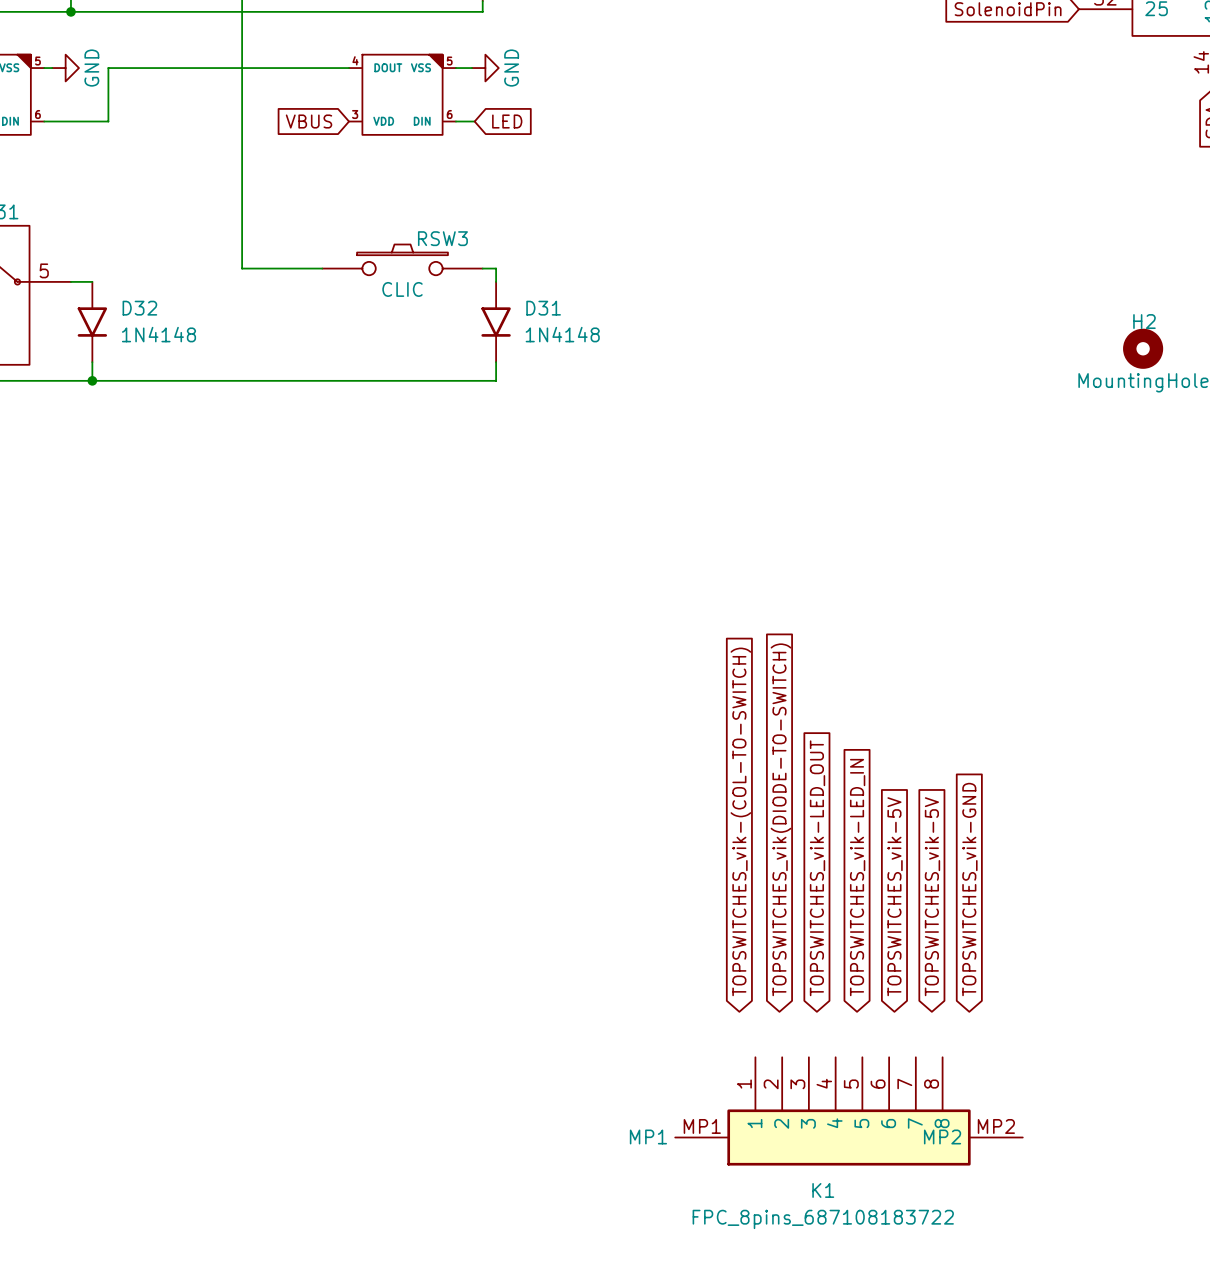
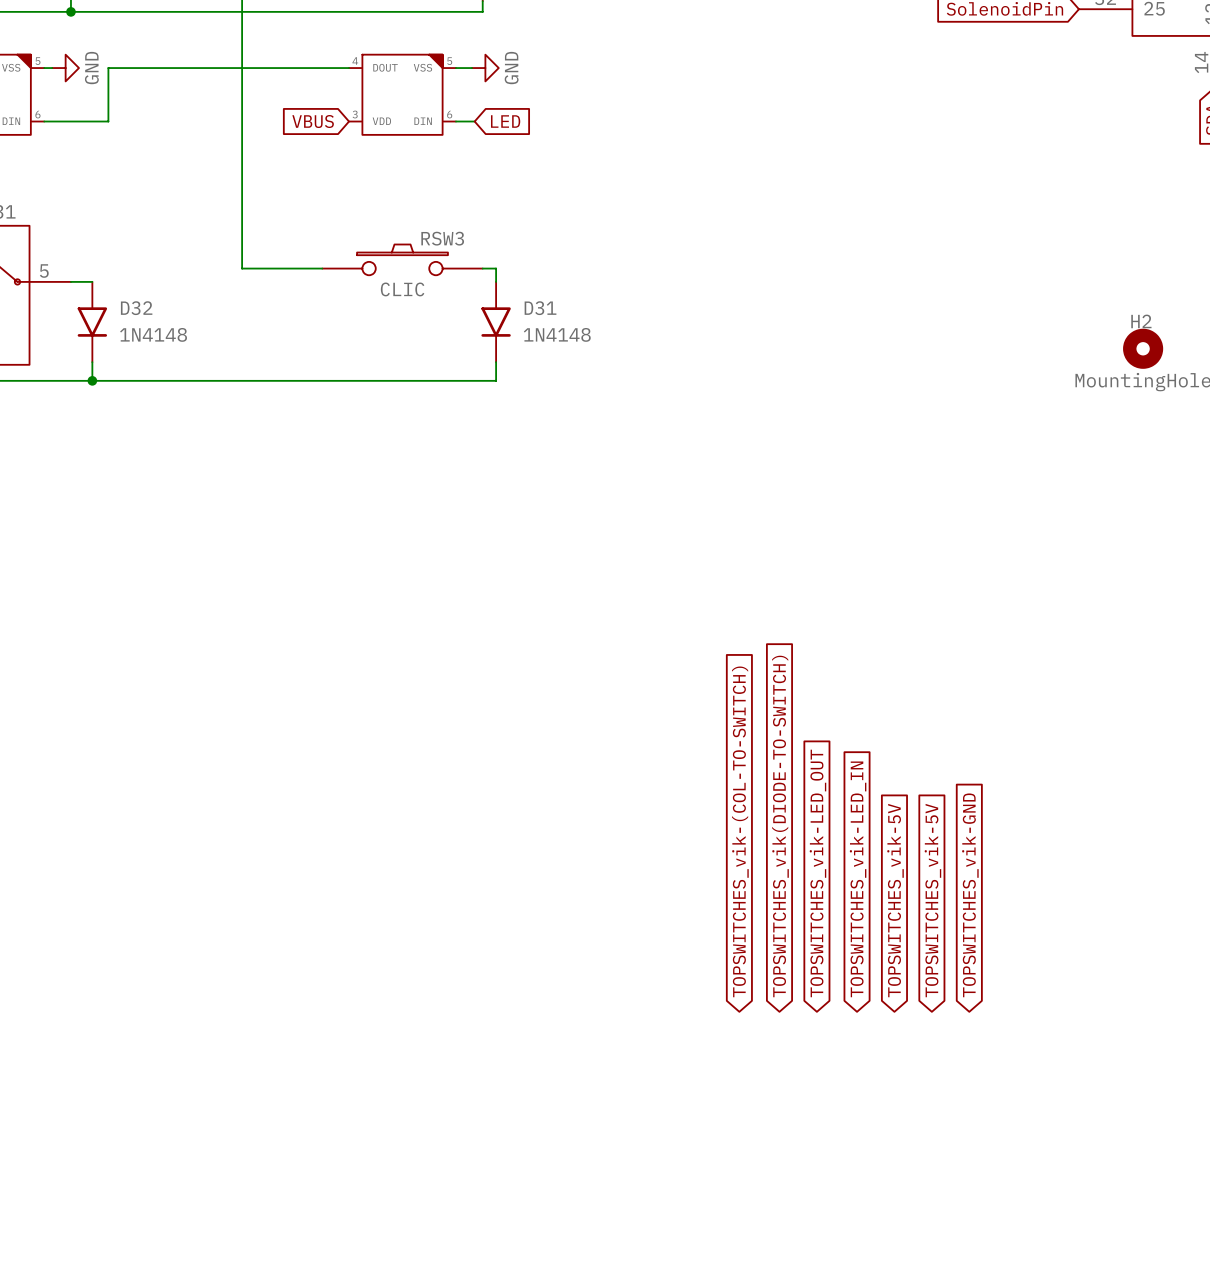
K1: FPC_8pins_687108183722 (849, 1111) -> none

